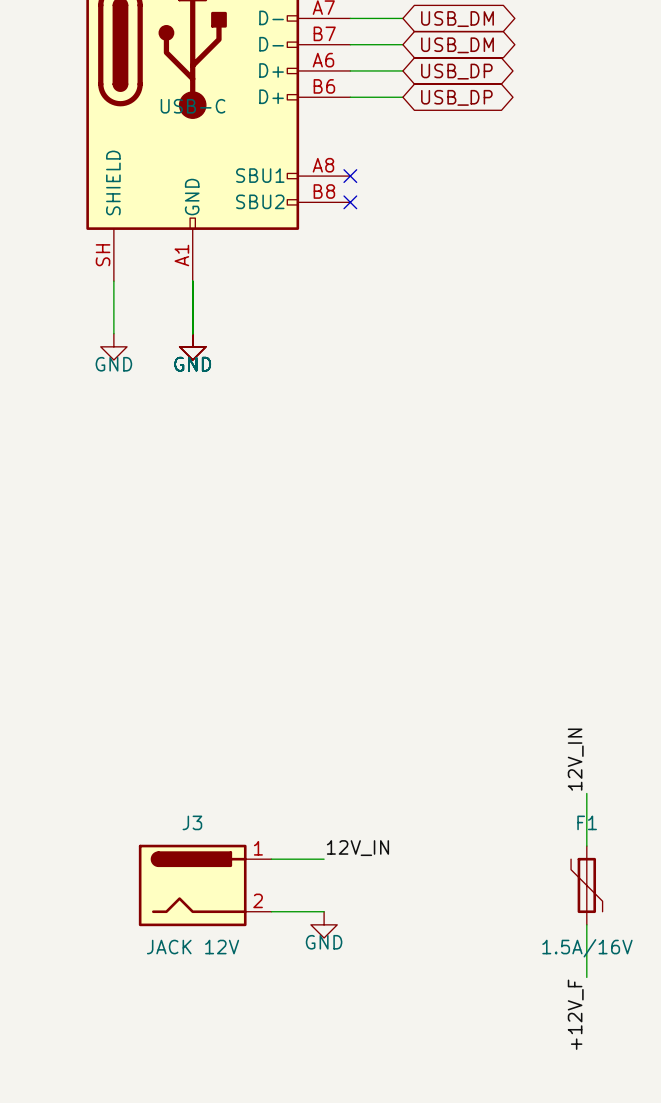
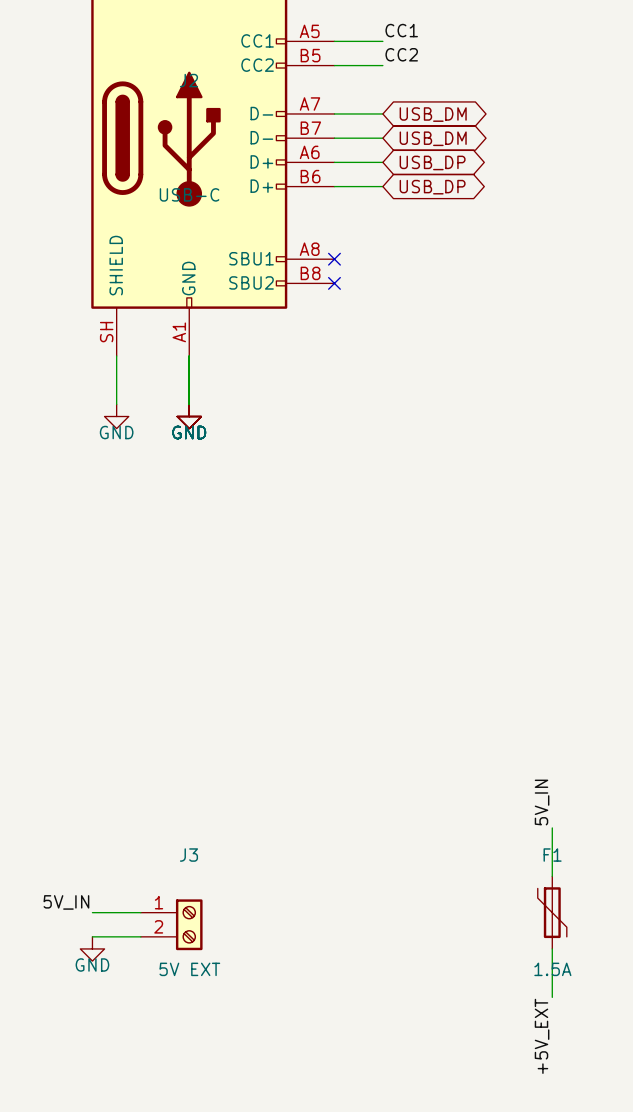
label: 12V_IN (575, 759) -> 5V_IN (542, 802)
J3 symbol: [138, 844, 272, 927] -> [140, 899, 203, 951]
label: 12V_IN (357, 848) -> none
wire: (271, 859) (324, 859) -> (92, 912) (140, 912)
label: none -> 5V_IN (66, 902)
wire: (271, 911) (324, 911) -> (92, 936) (140, 936)
power symbol position: GND (324, 924) -> GND (92, 948)
J3 value: JACK 12V (193, 947) -> 5V EXT (189, 969)
F1 value: 1.5A/16V (587, 948) -> 1.5A (552, 969)
label: +12V_F (575, 1014) -> +5V_EXT (542, 1036)

